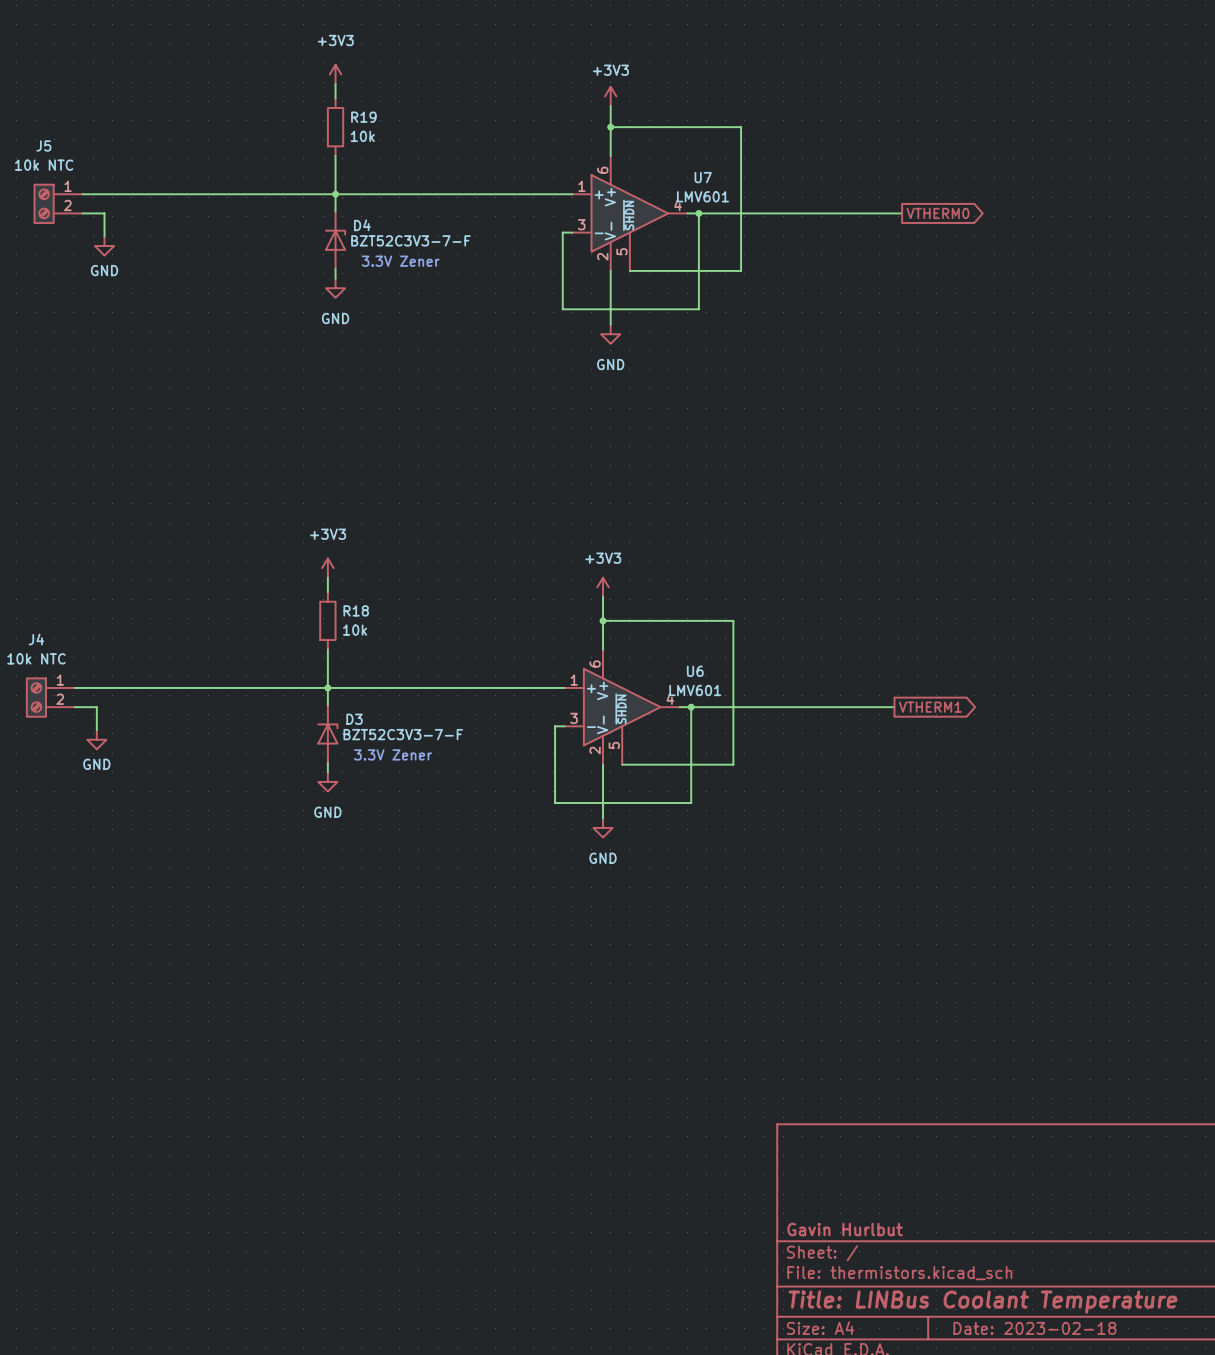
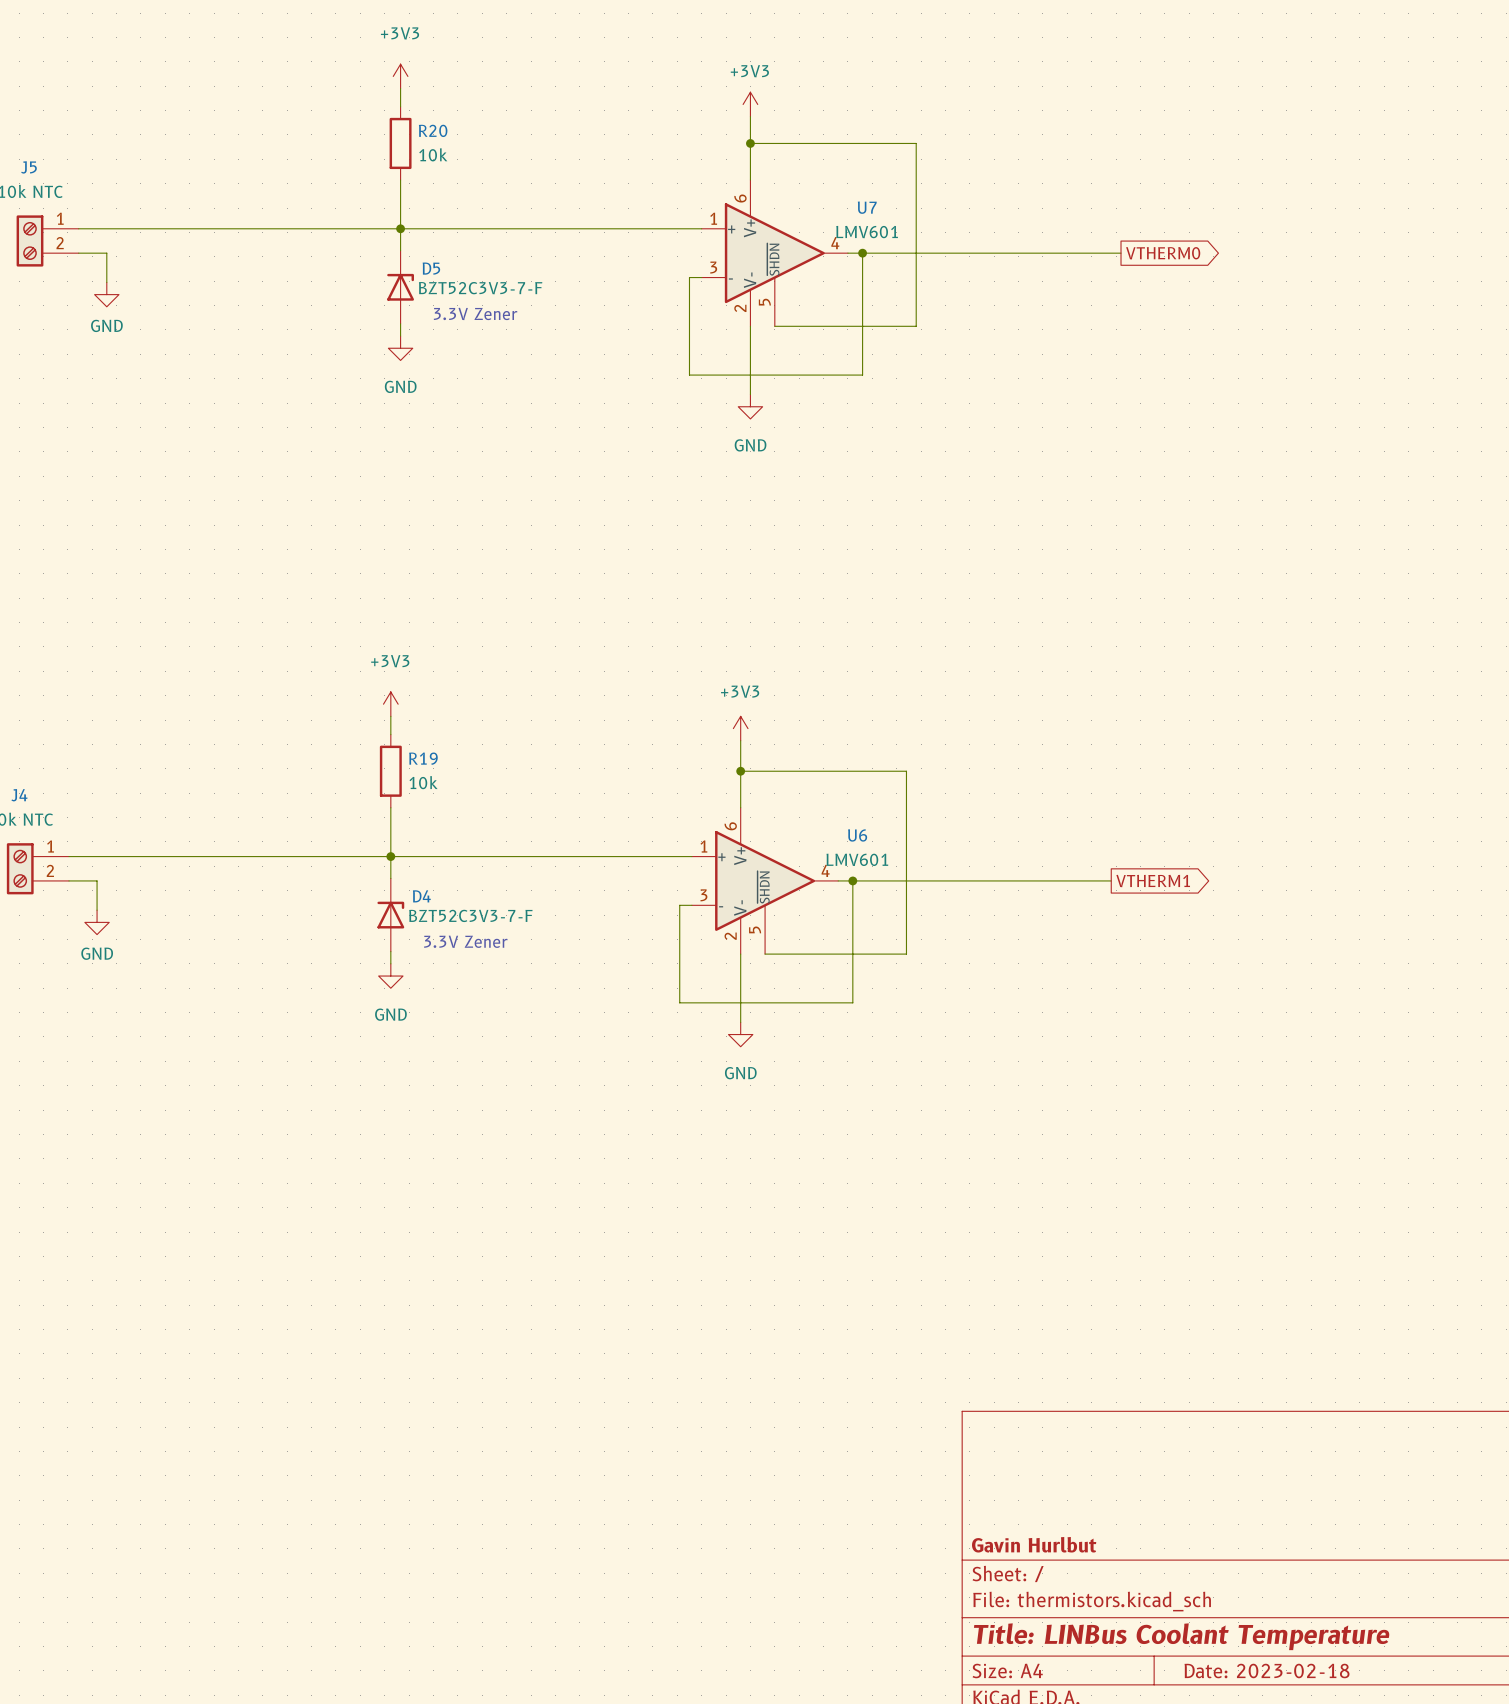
R19 name: R19 (363, 117) -> R20 (433, 130)
D4 name: D4 (362, 225) -> D5 (431, 268)
R18 name: R18 (356, 610) -> R19 (423, 758)
D3 name: D3 (354, 719) -> D4 (421, 896)

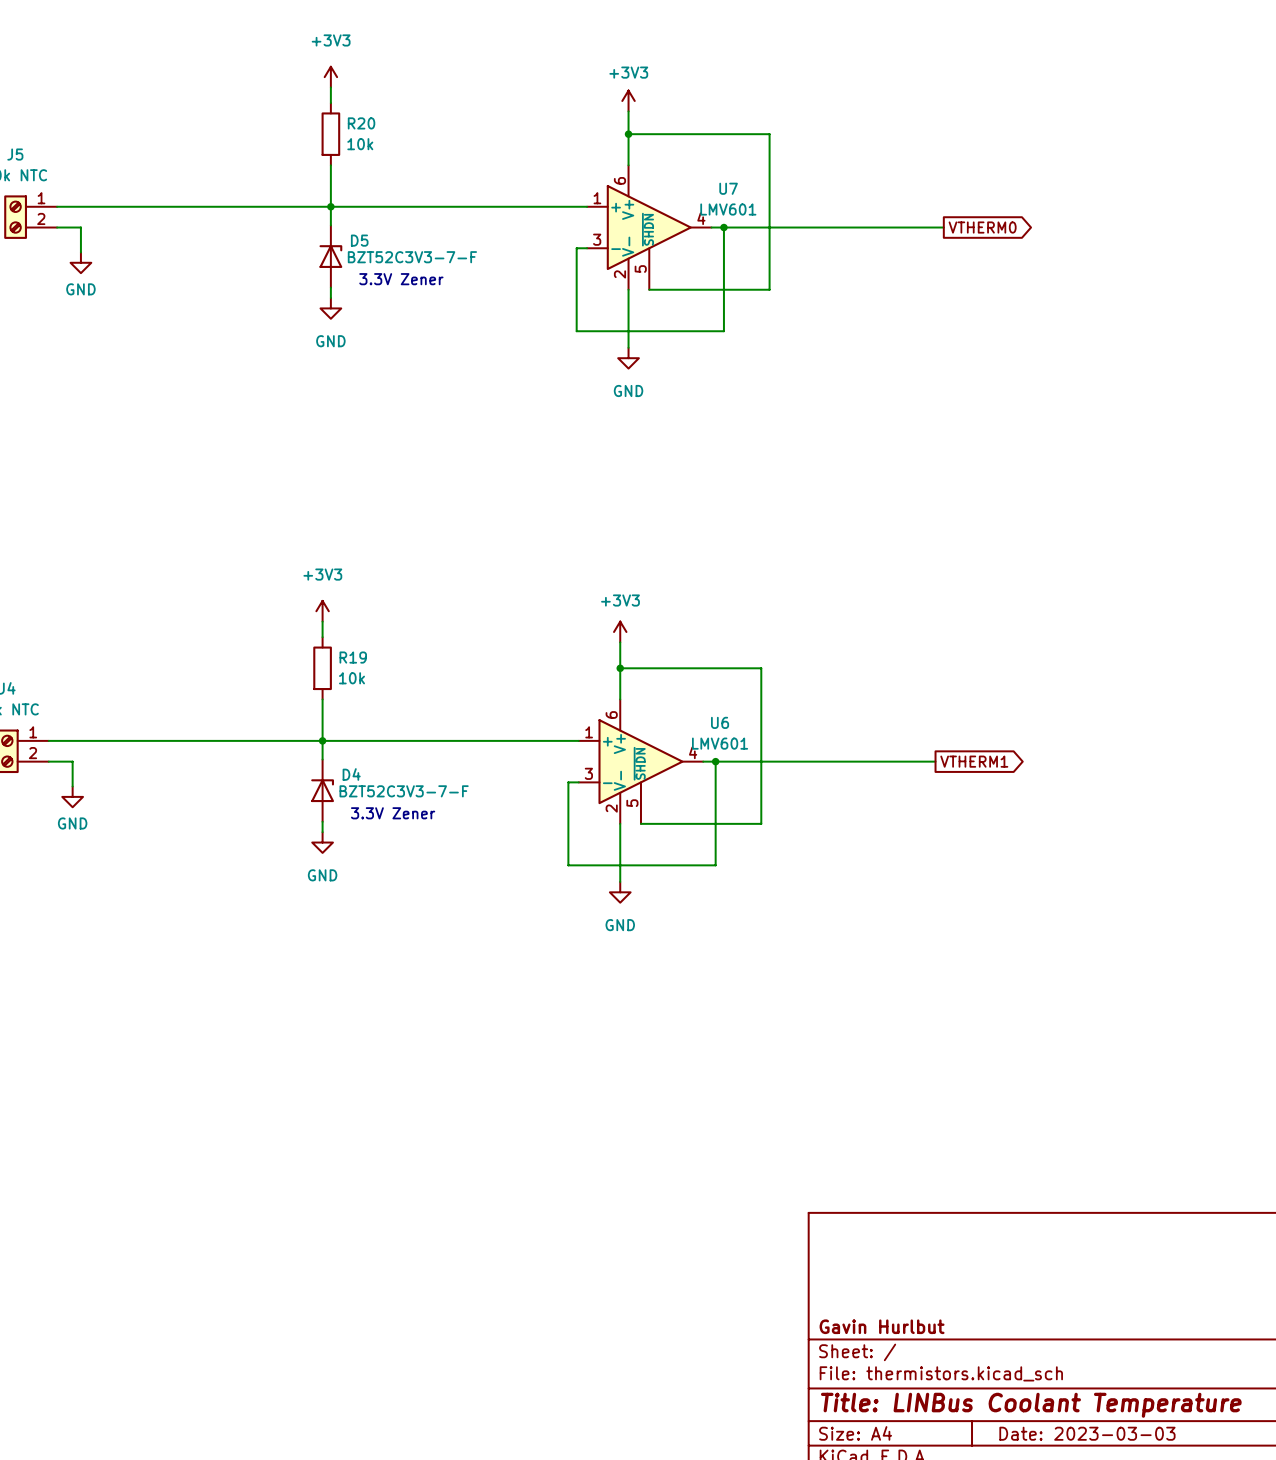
title block: Date: 2023-02-18 (1267, 1670) -> Date: 2023-03-03 (1087, 1433)

